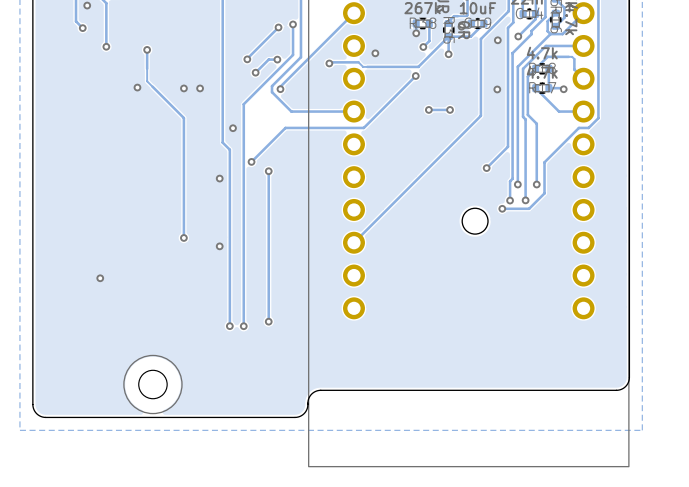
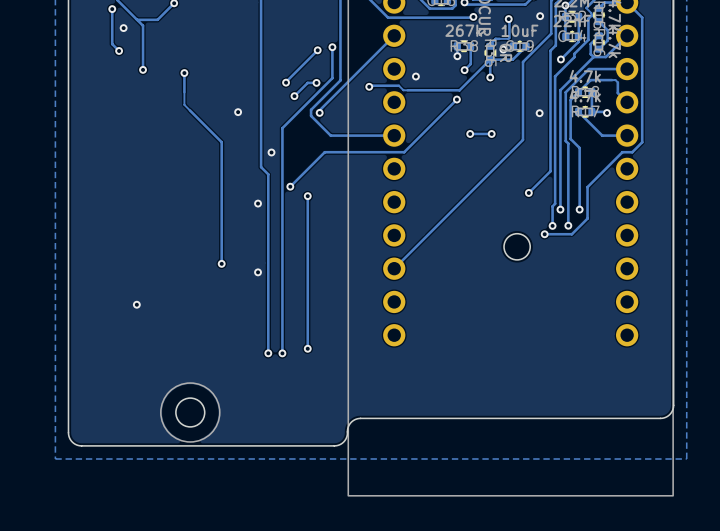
via: (497, 40) -> none
via: (137, 87) -> none
via: (183, 88) -> none

